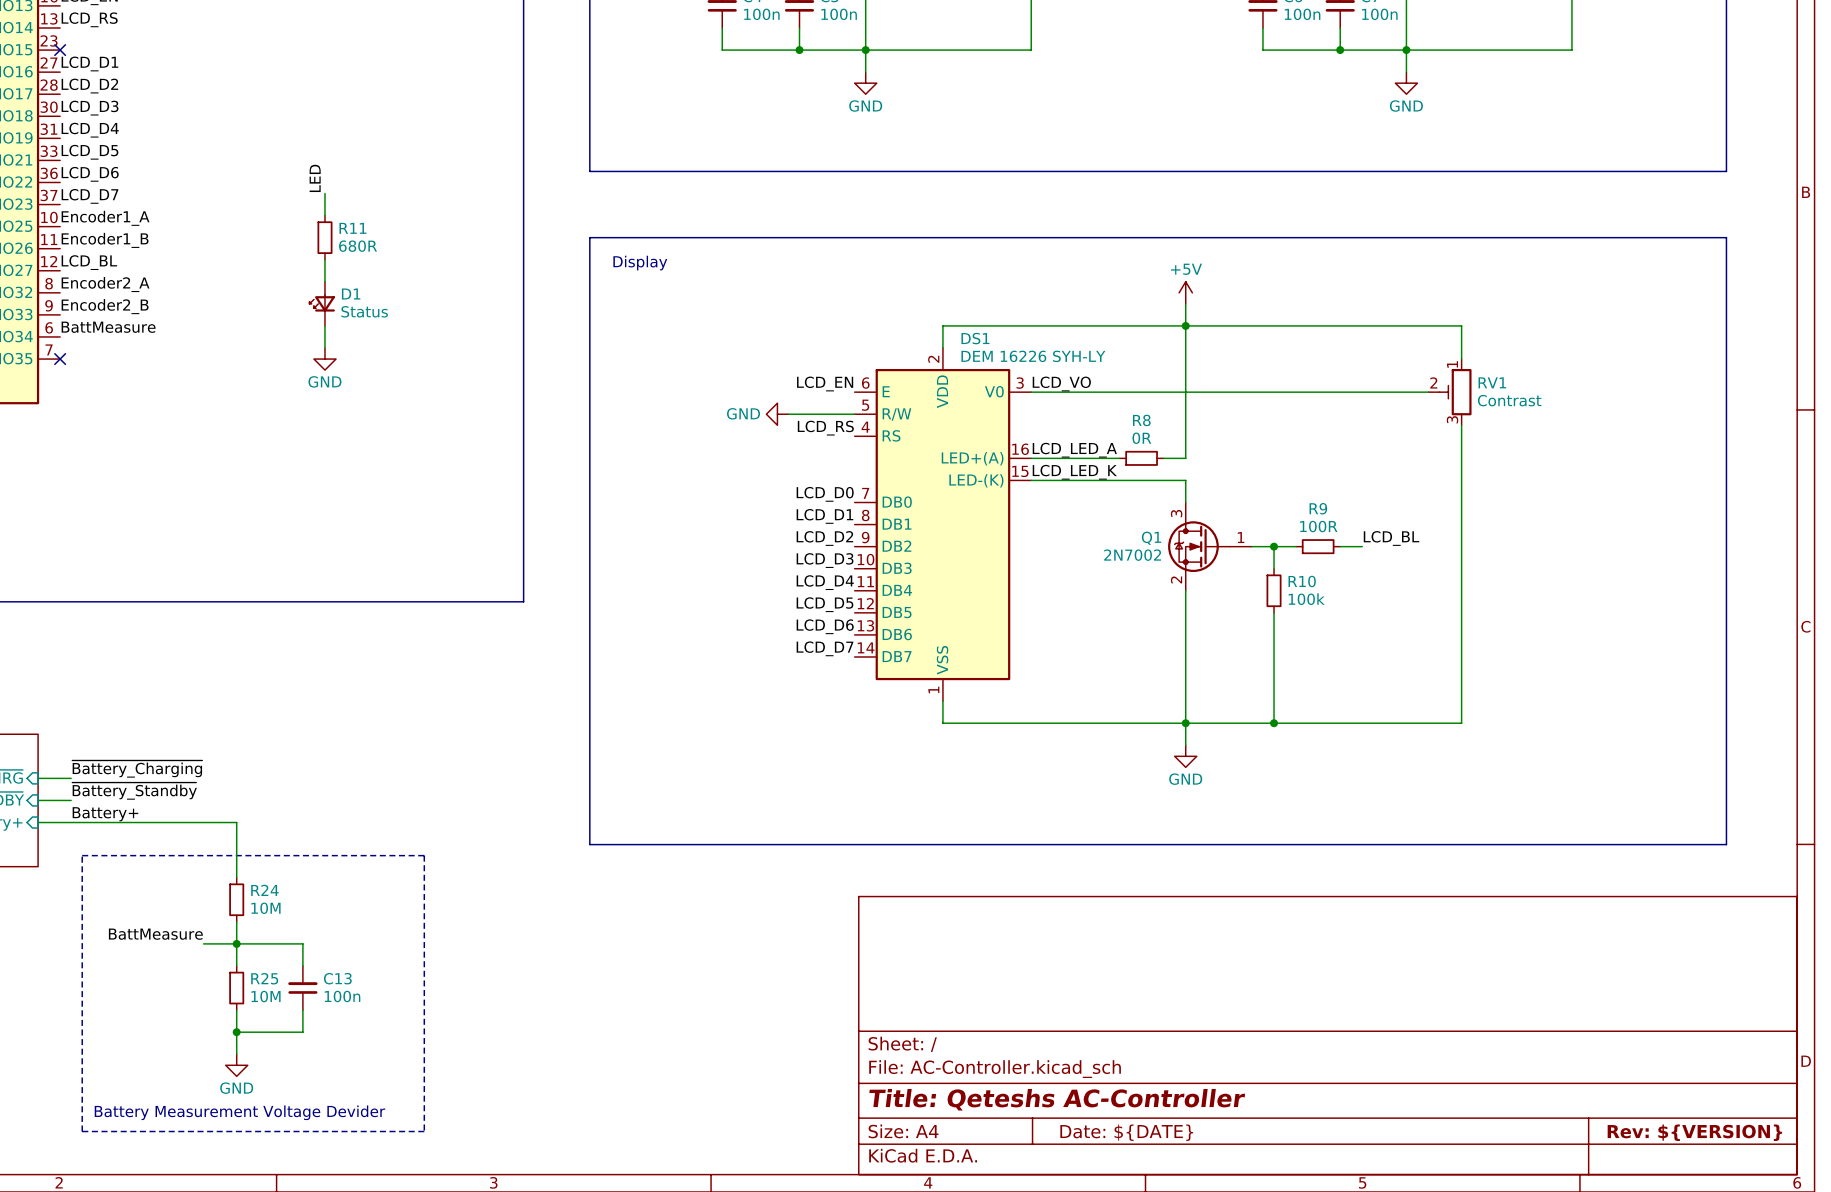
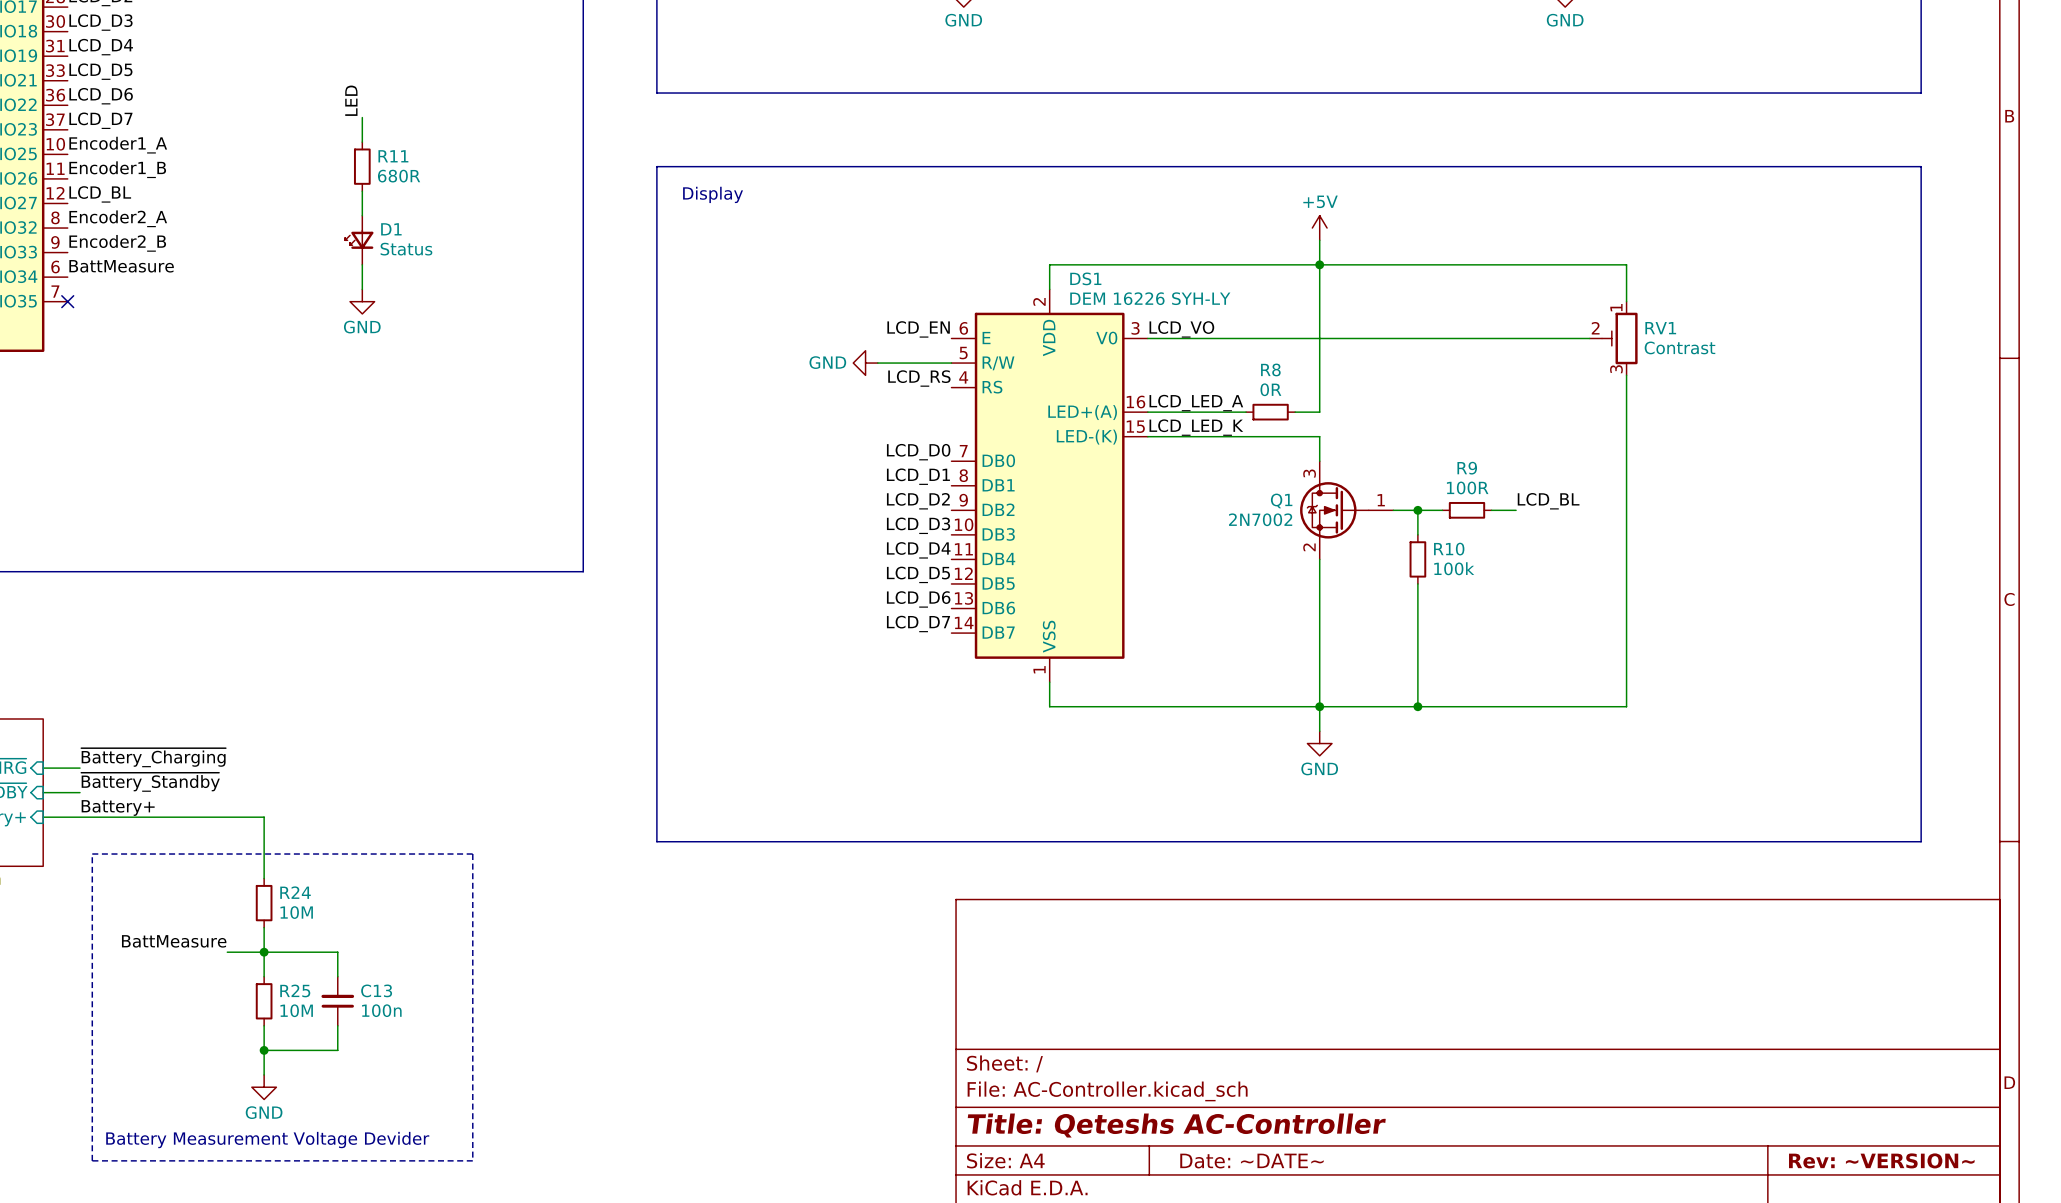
title block: Date: ${DATE} (1126, 1132) -> Date: ~DATE~ (1251, 1161)
title block: Rev: ${VERSION} (1694, 1132) -> Rev: ~VERSION~ (1881, 1160)

